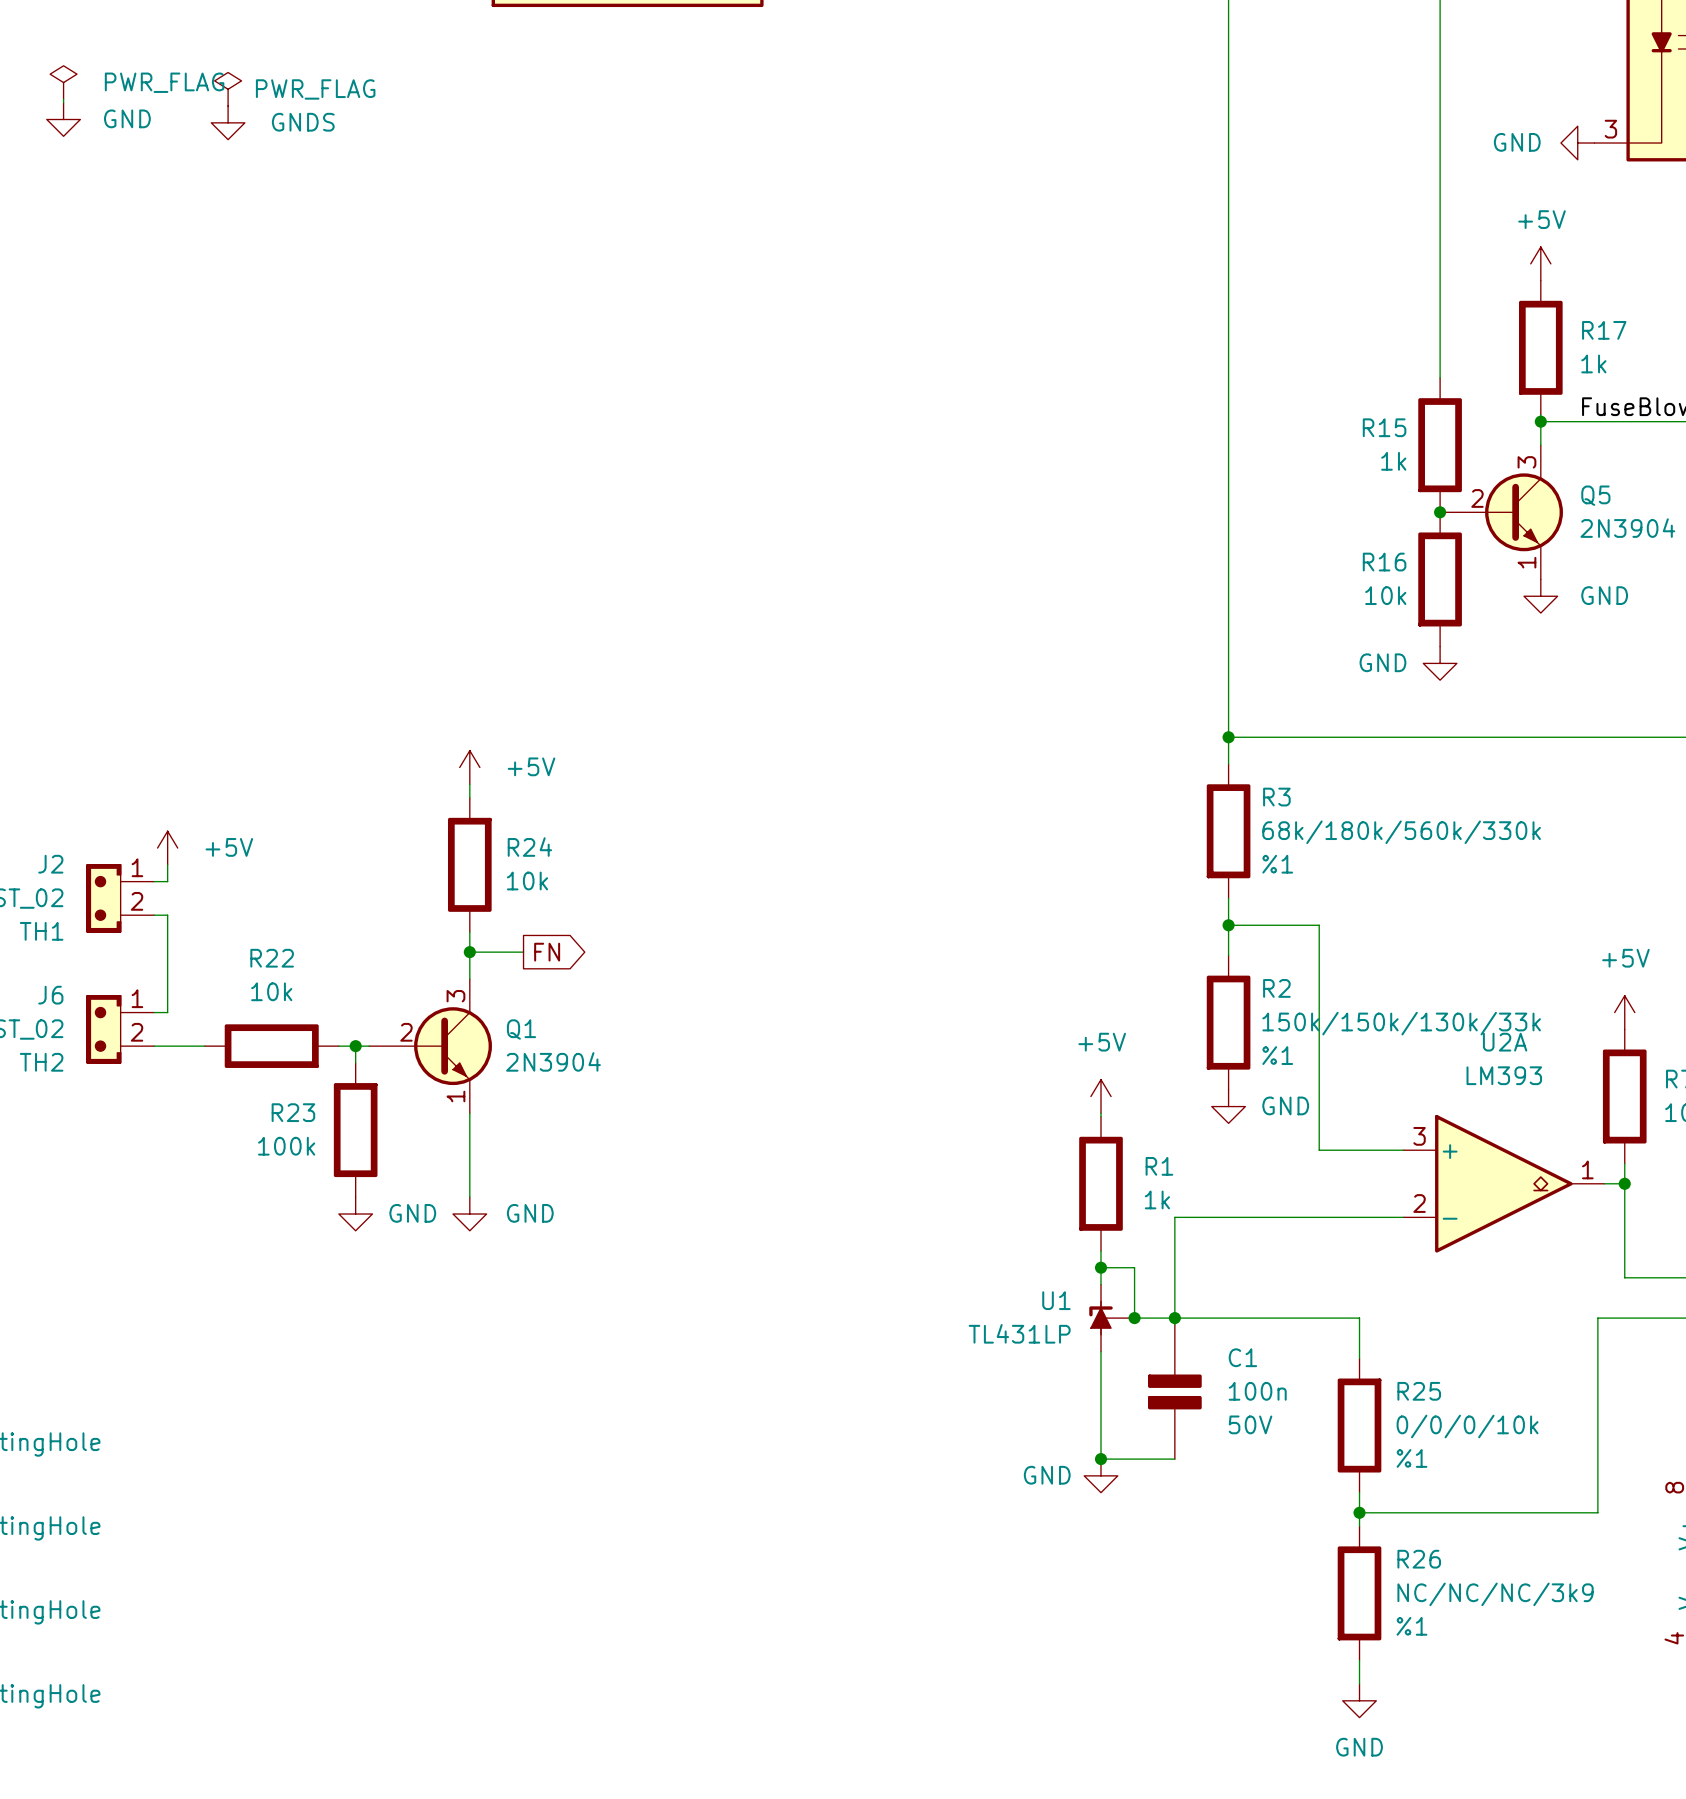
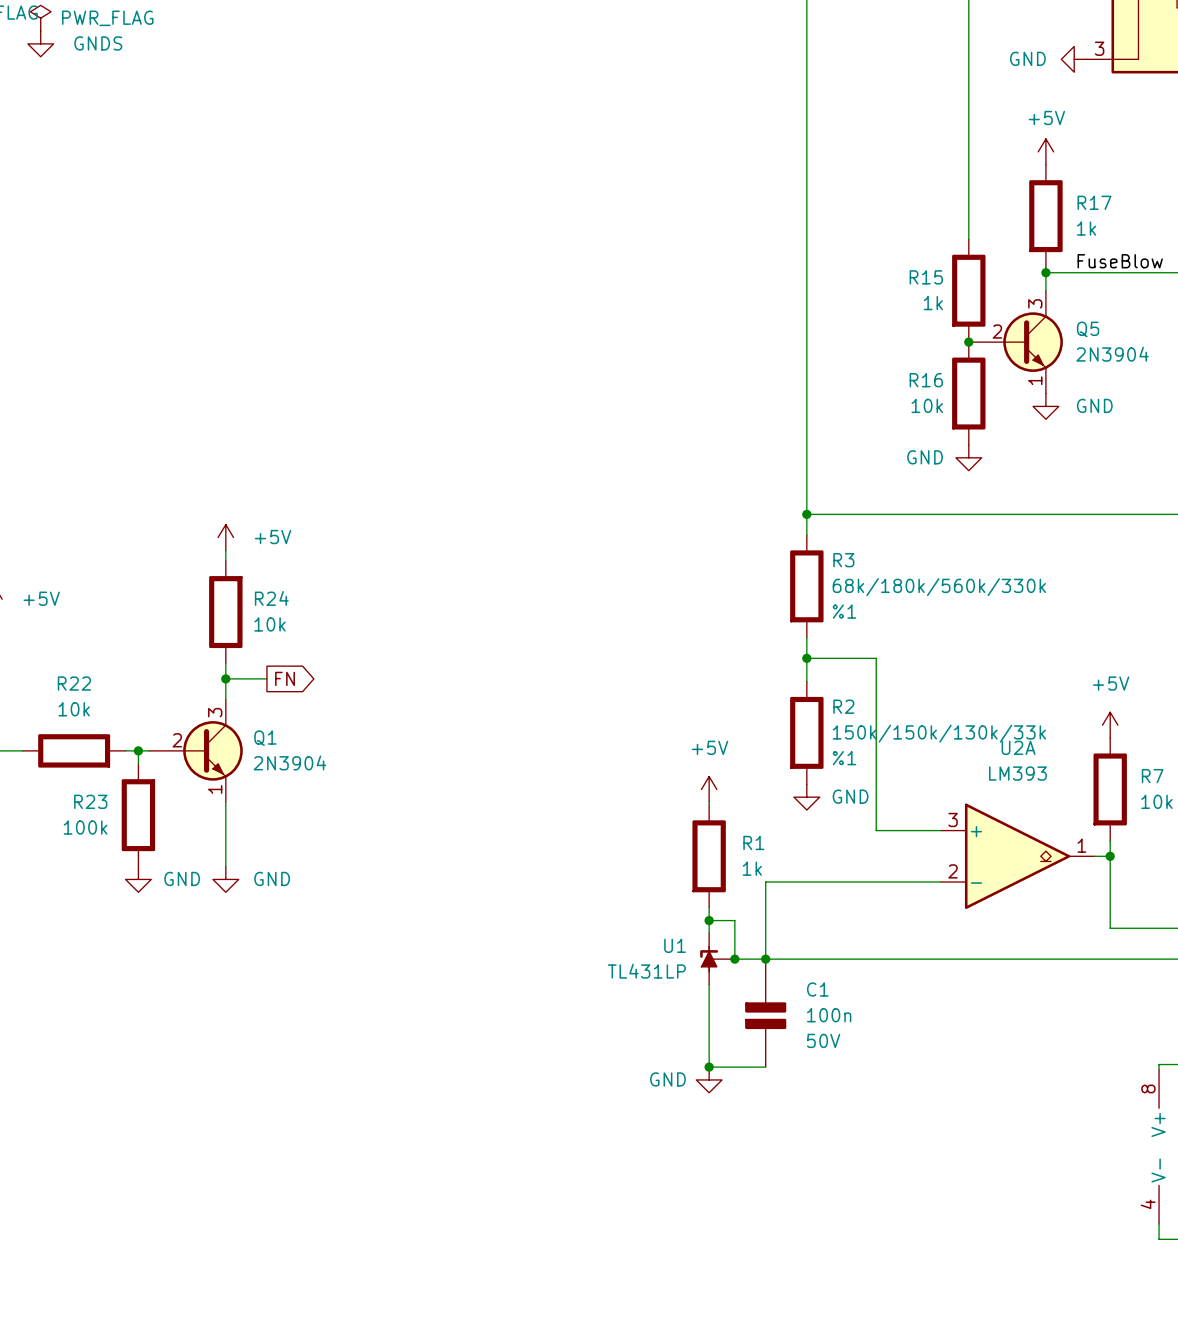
wire: (1359, 1318) (1359, 1358) -> none
wire: (1597, 1318) (1597, 1512) (1359, 1512) -> (1089, 959) (907, 959)
R25: 0/0/0/10k (1359, 1425) -> none
wire: (1359, 1492) (1359, 1526) -> none
junction: (1359, 1512) -> none
R26: NC/NC/NC/3k9 (1359, 1593) -> none
wire: (1359, 1660) (1359, 1684) -> none
power symbol: GND (1359, 1700) -> none

